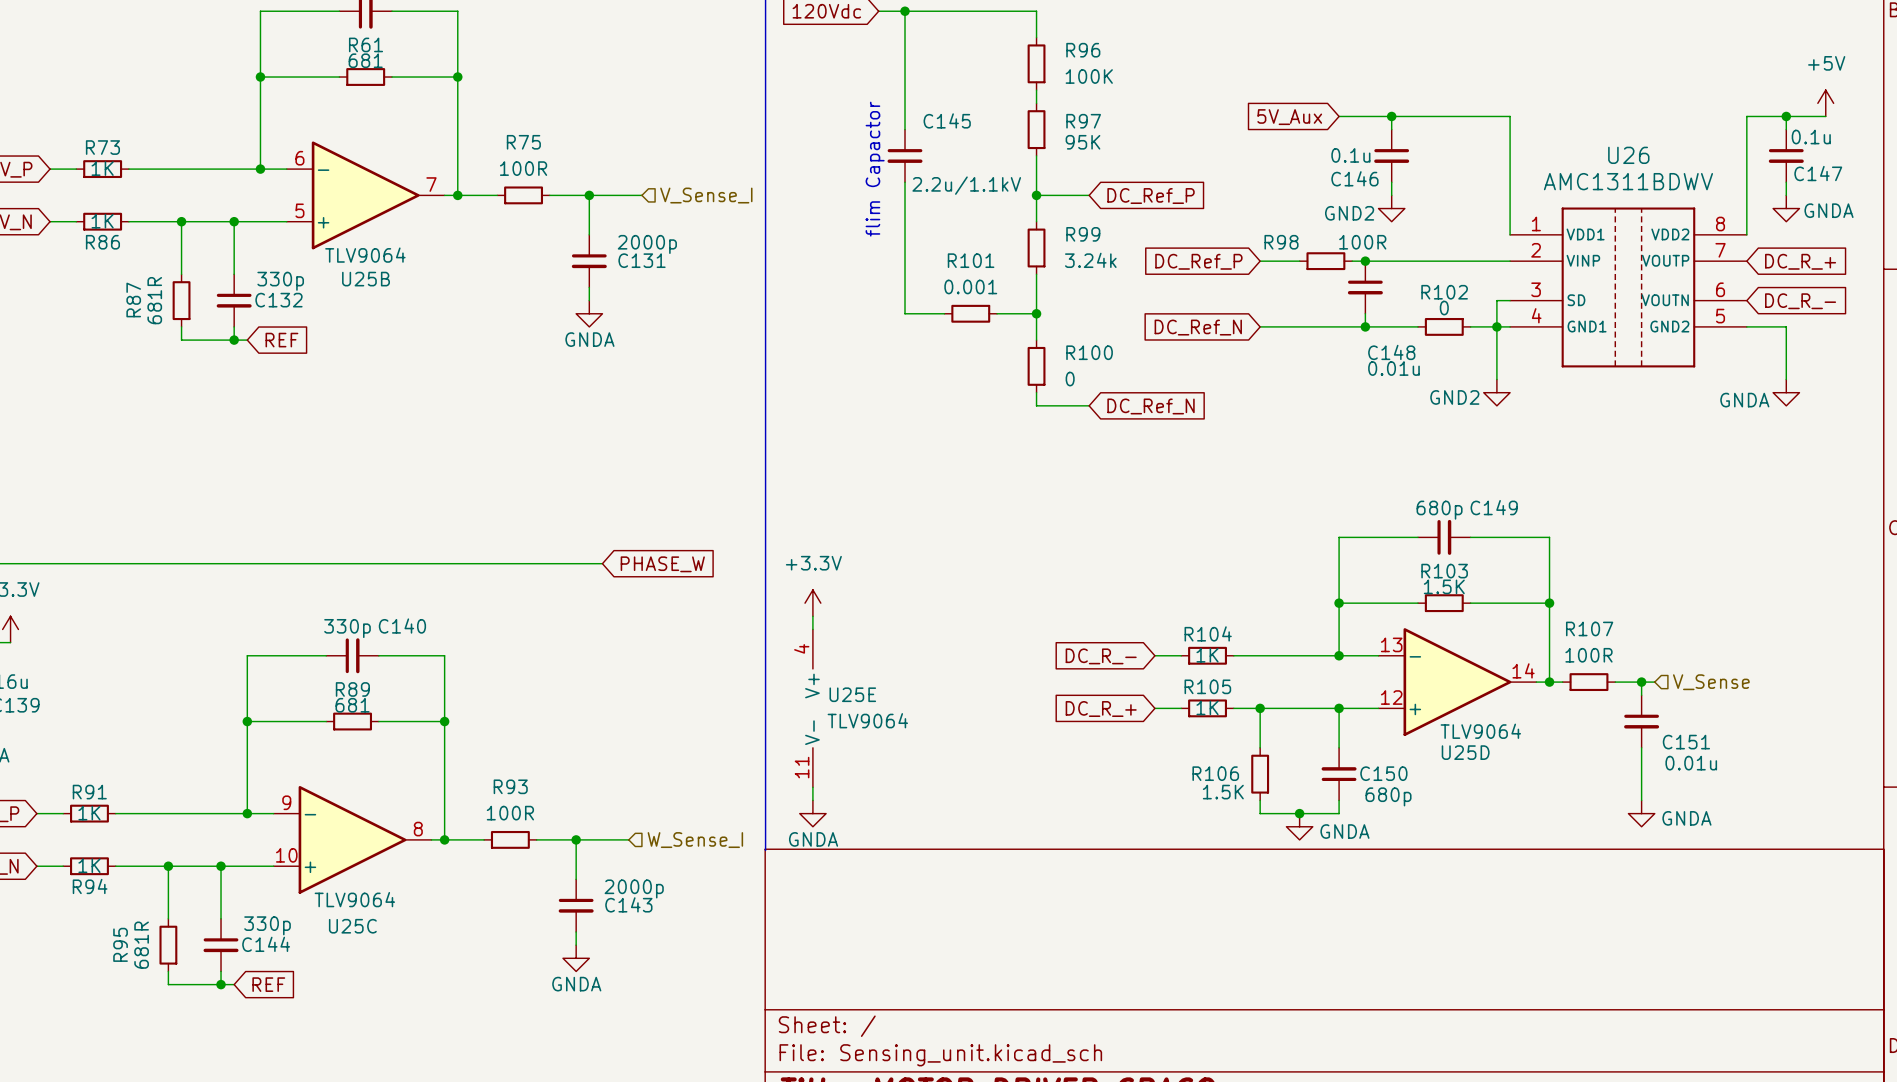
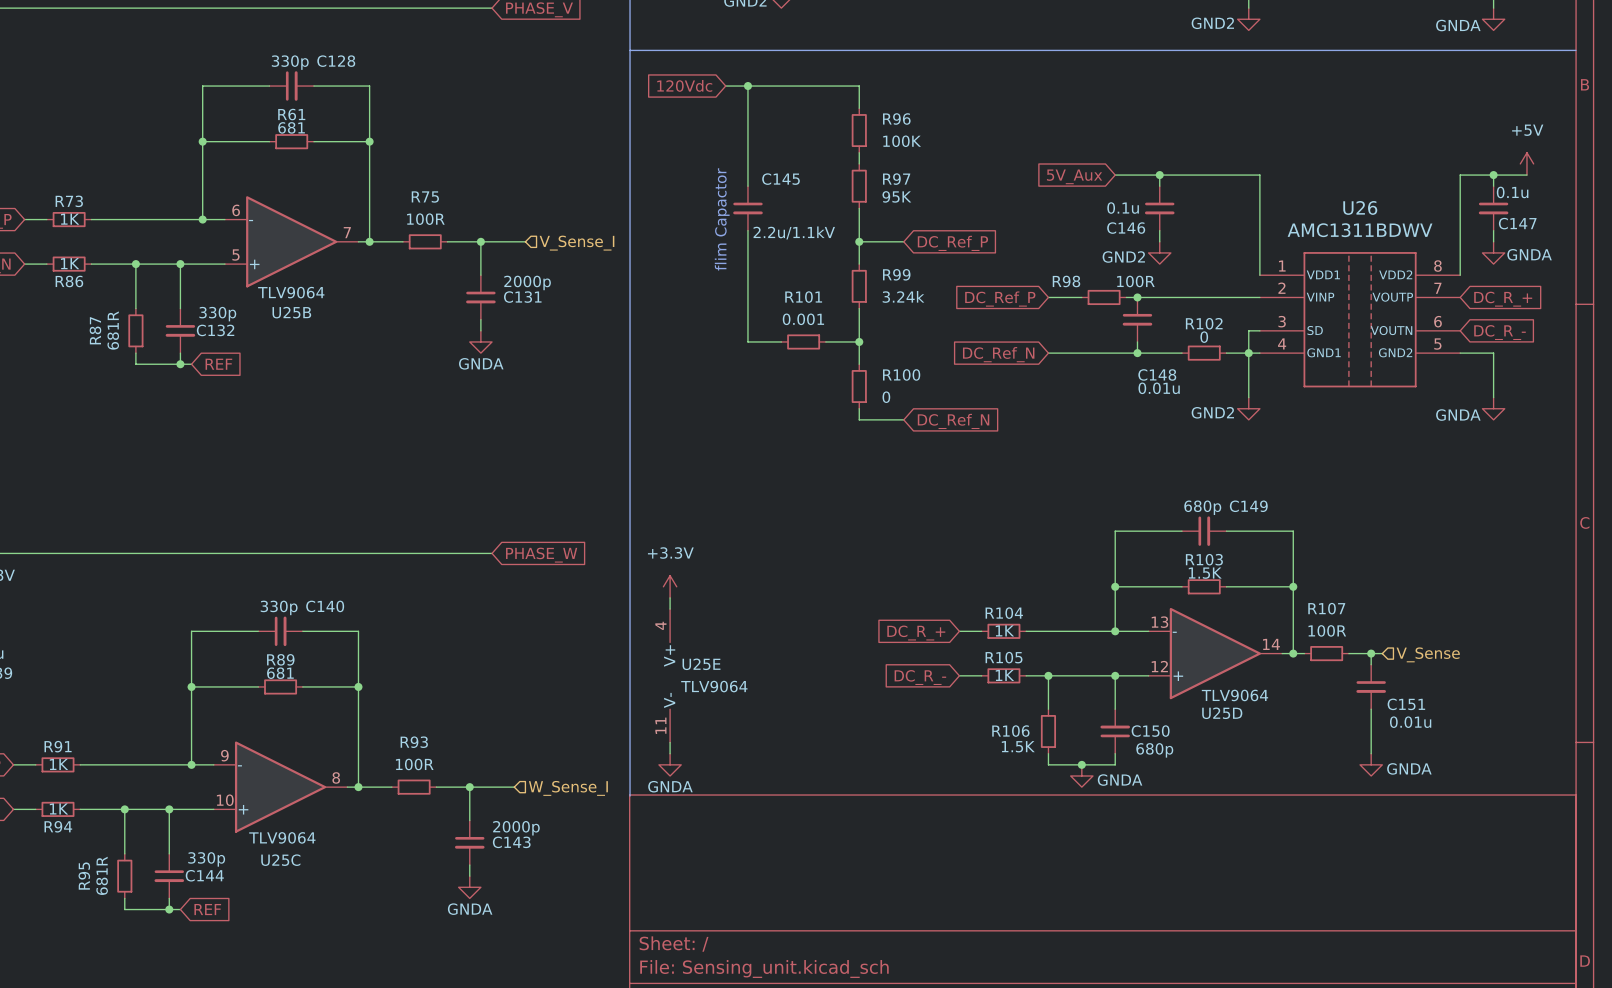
global label: DC_R_- (1101, 656) -> DC_R_+ (916, 633)
global label: DC_R_+ (1101, 709) -> DC_R_- (920, 677)

